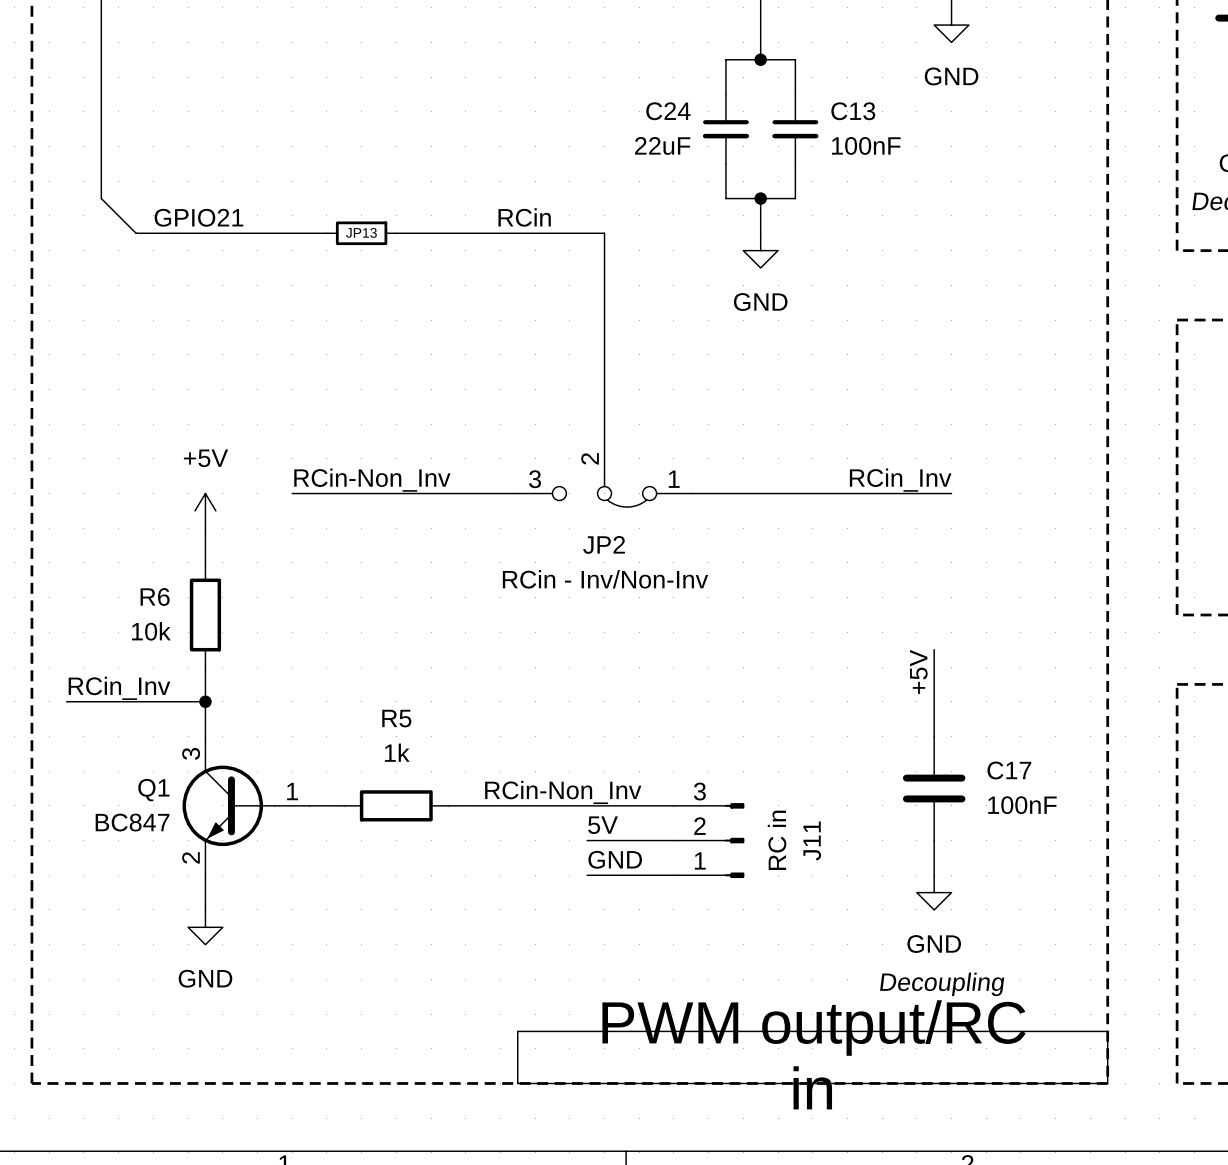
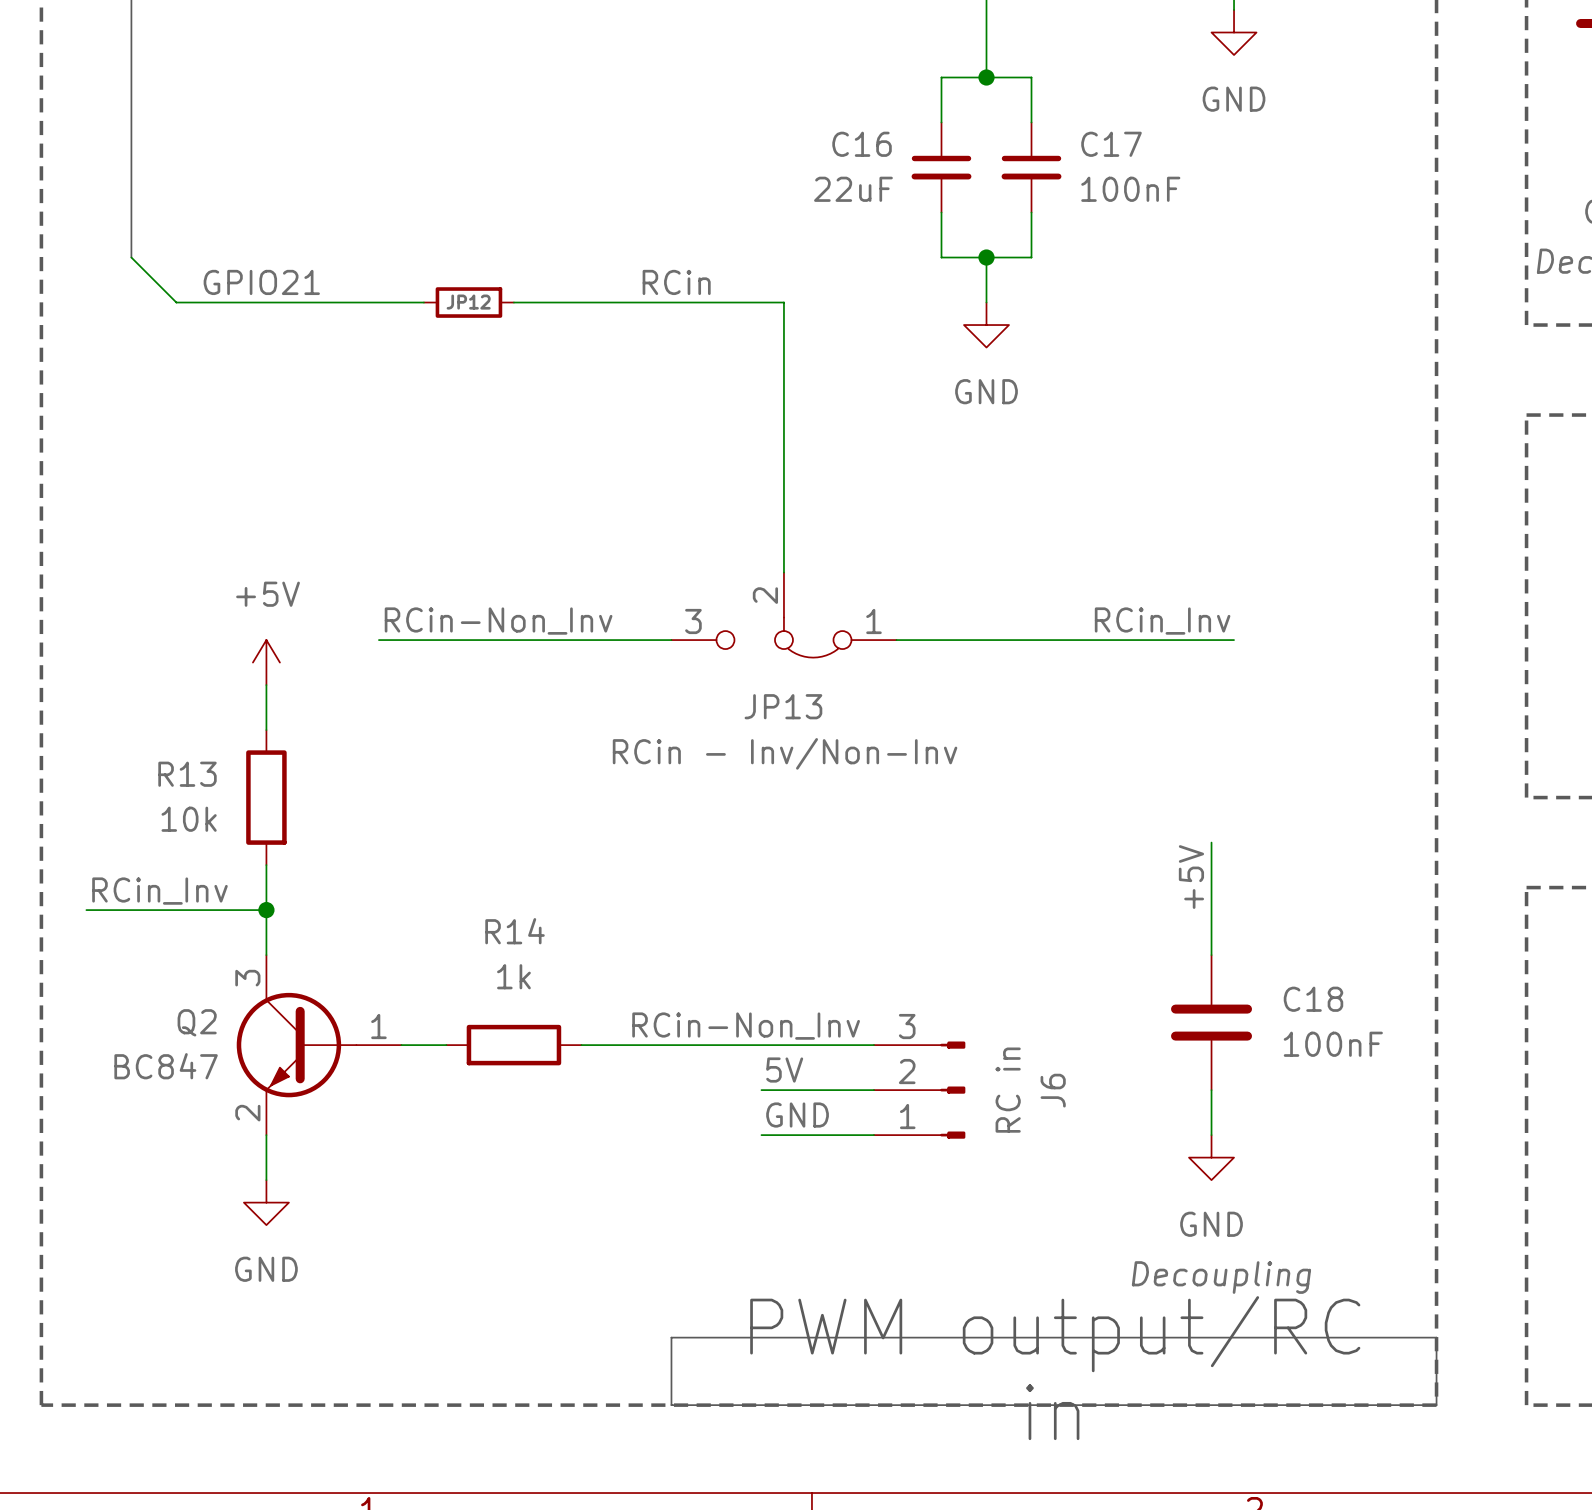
C24 name: C24 (668, 111) -> C16 (862, 144)
C13 name: C13 (853, 111) -> C17 (1111, 144)
JP13 name: JP13 (361, 232) -> JP12 (468, 302)
JP2 name: JP2 (604, 544) -> JP13 (783, 706)
R6 name: R6 (155, 596) -> R13 (187, 774)
R5 name: R5 (396, 718) -> R14 (515, 931)
C17 name: C17 (1009, 770) -> C18 (1313, 999)
Q1 name: Q1 (153, 790) -> Q2 (197, 1022)
J11 name: J11 (812, 840) -> J6 (1053, 1090)

